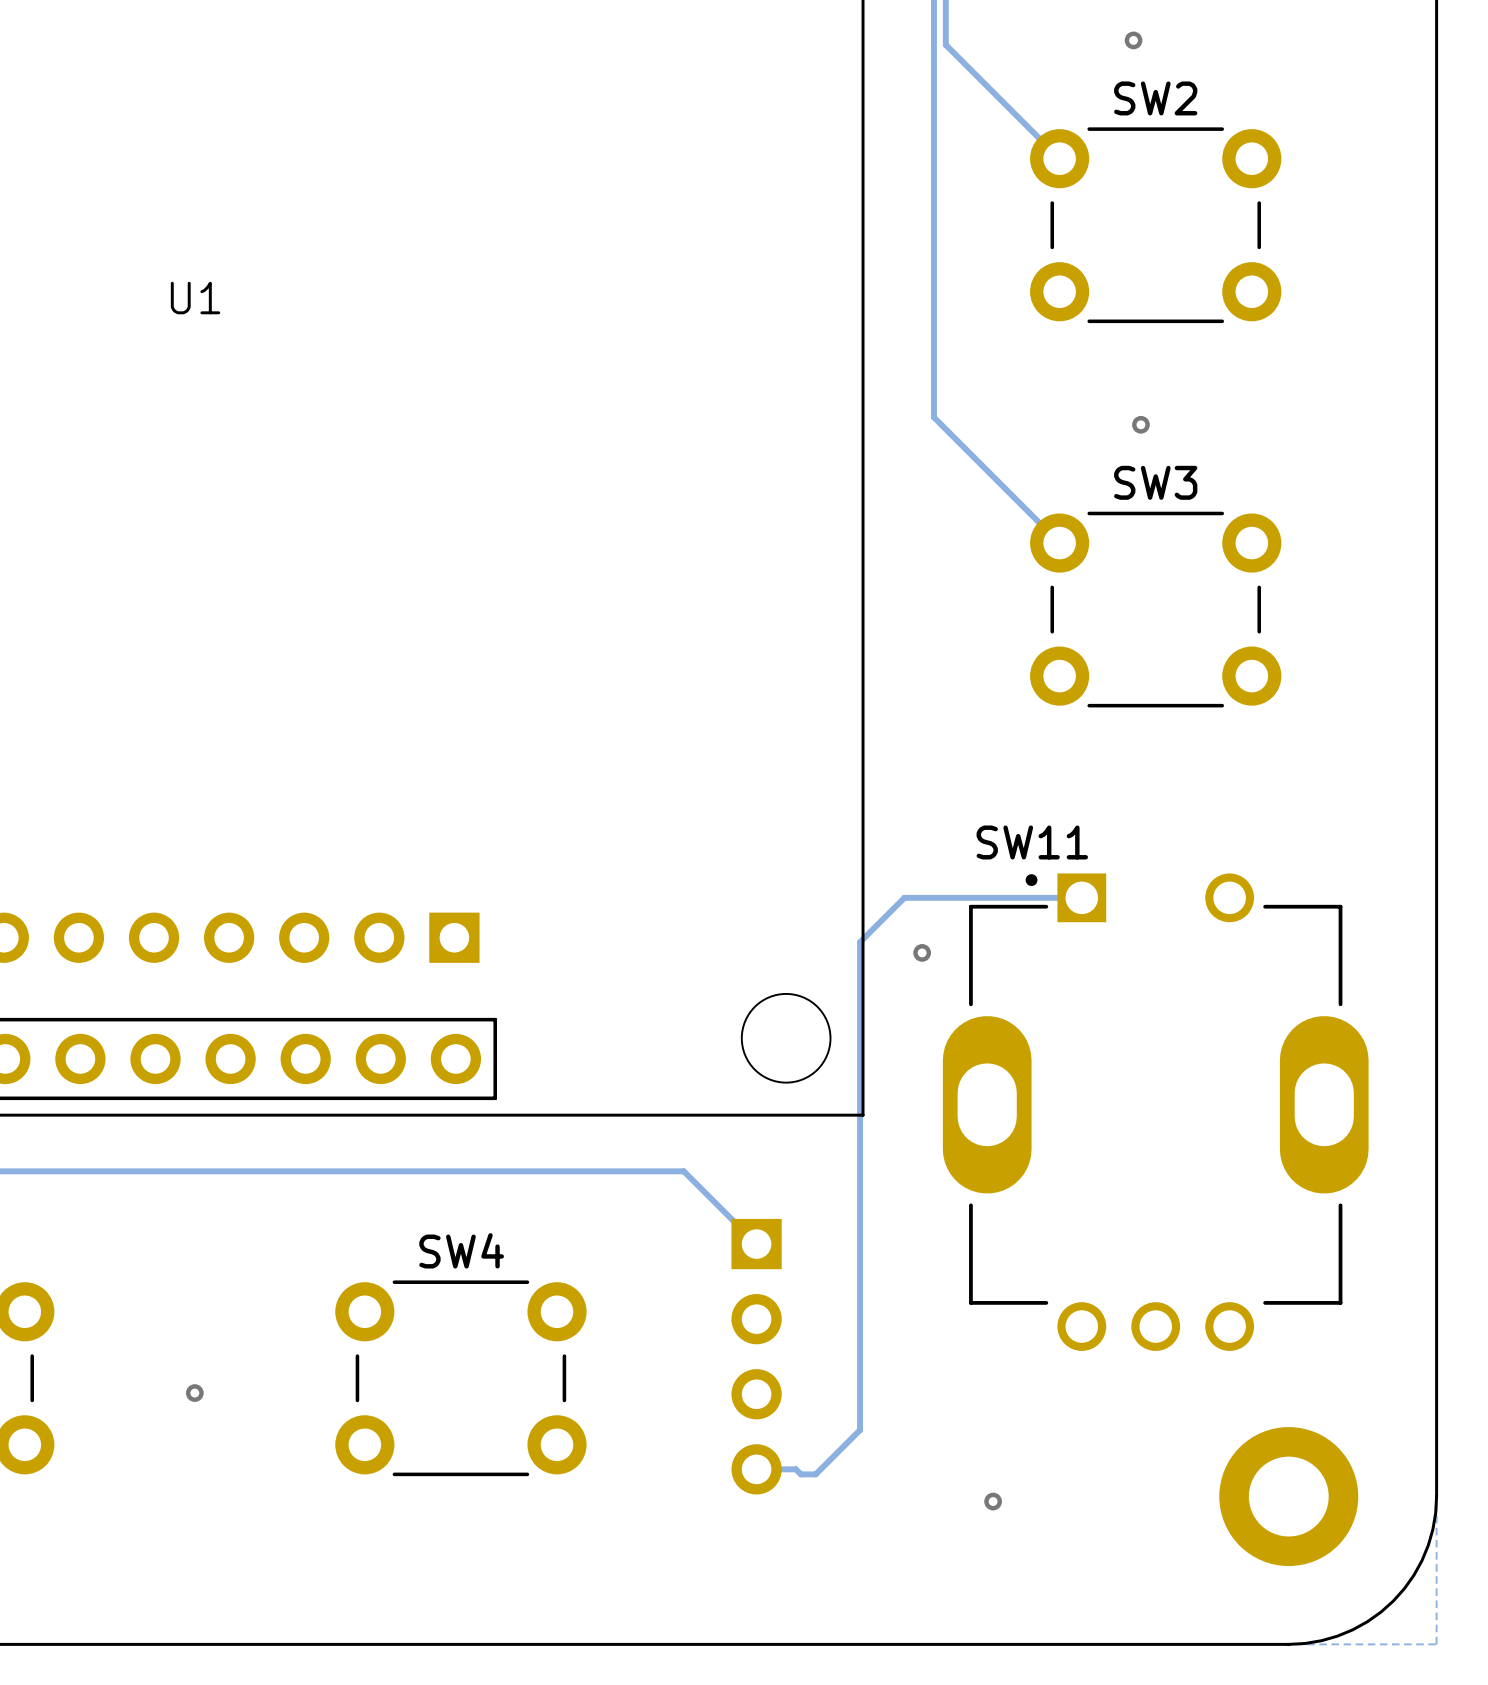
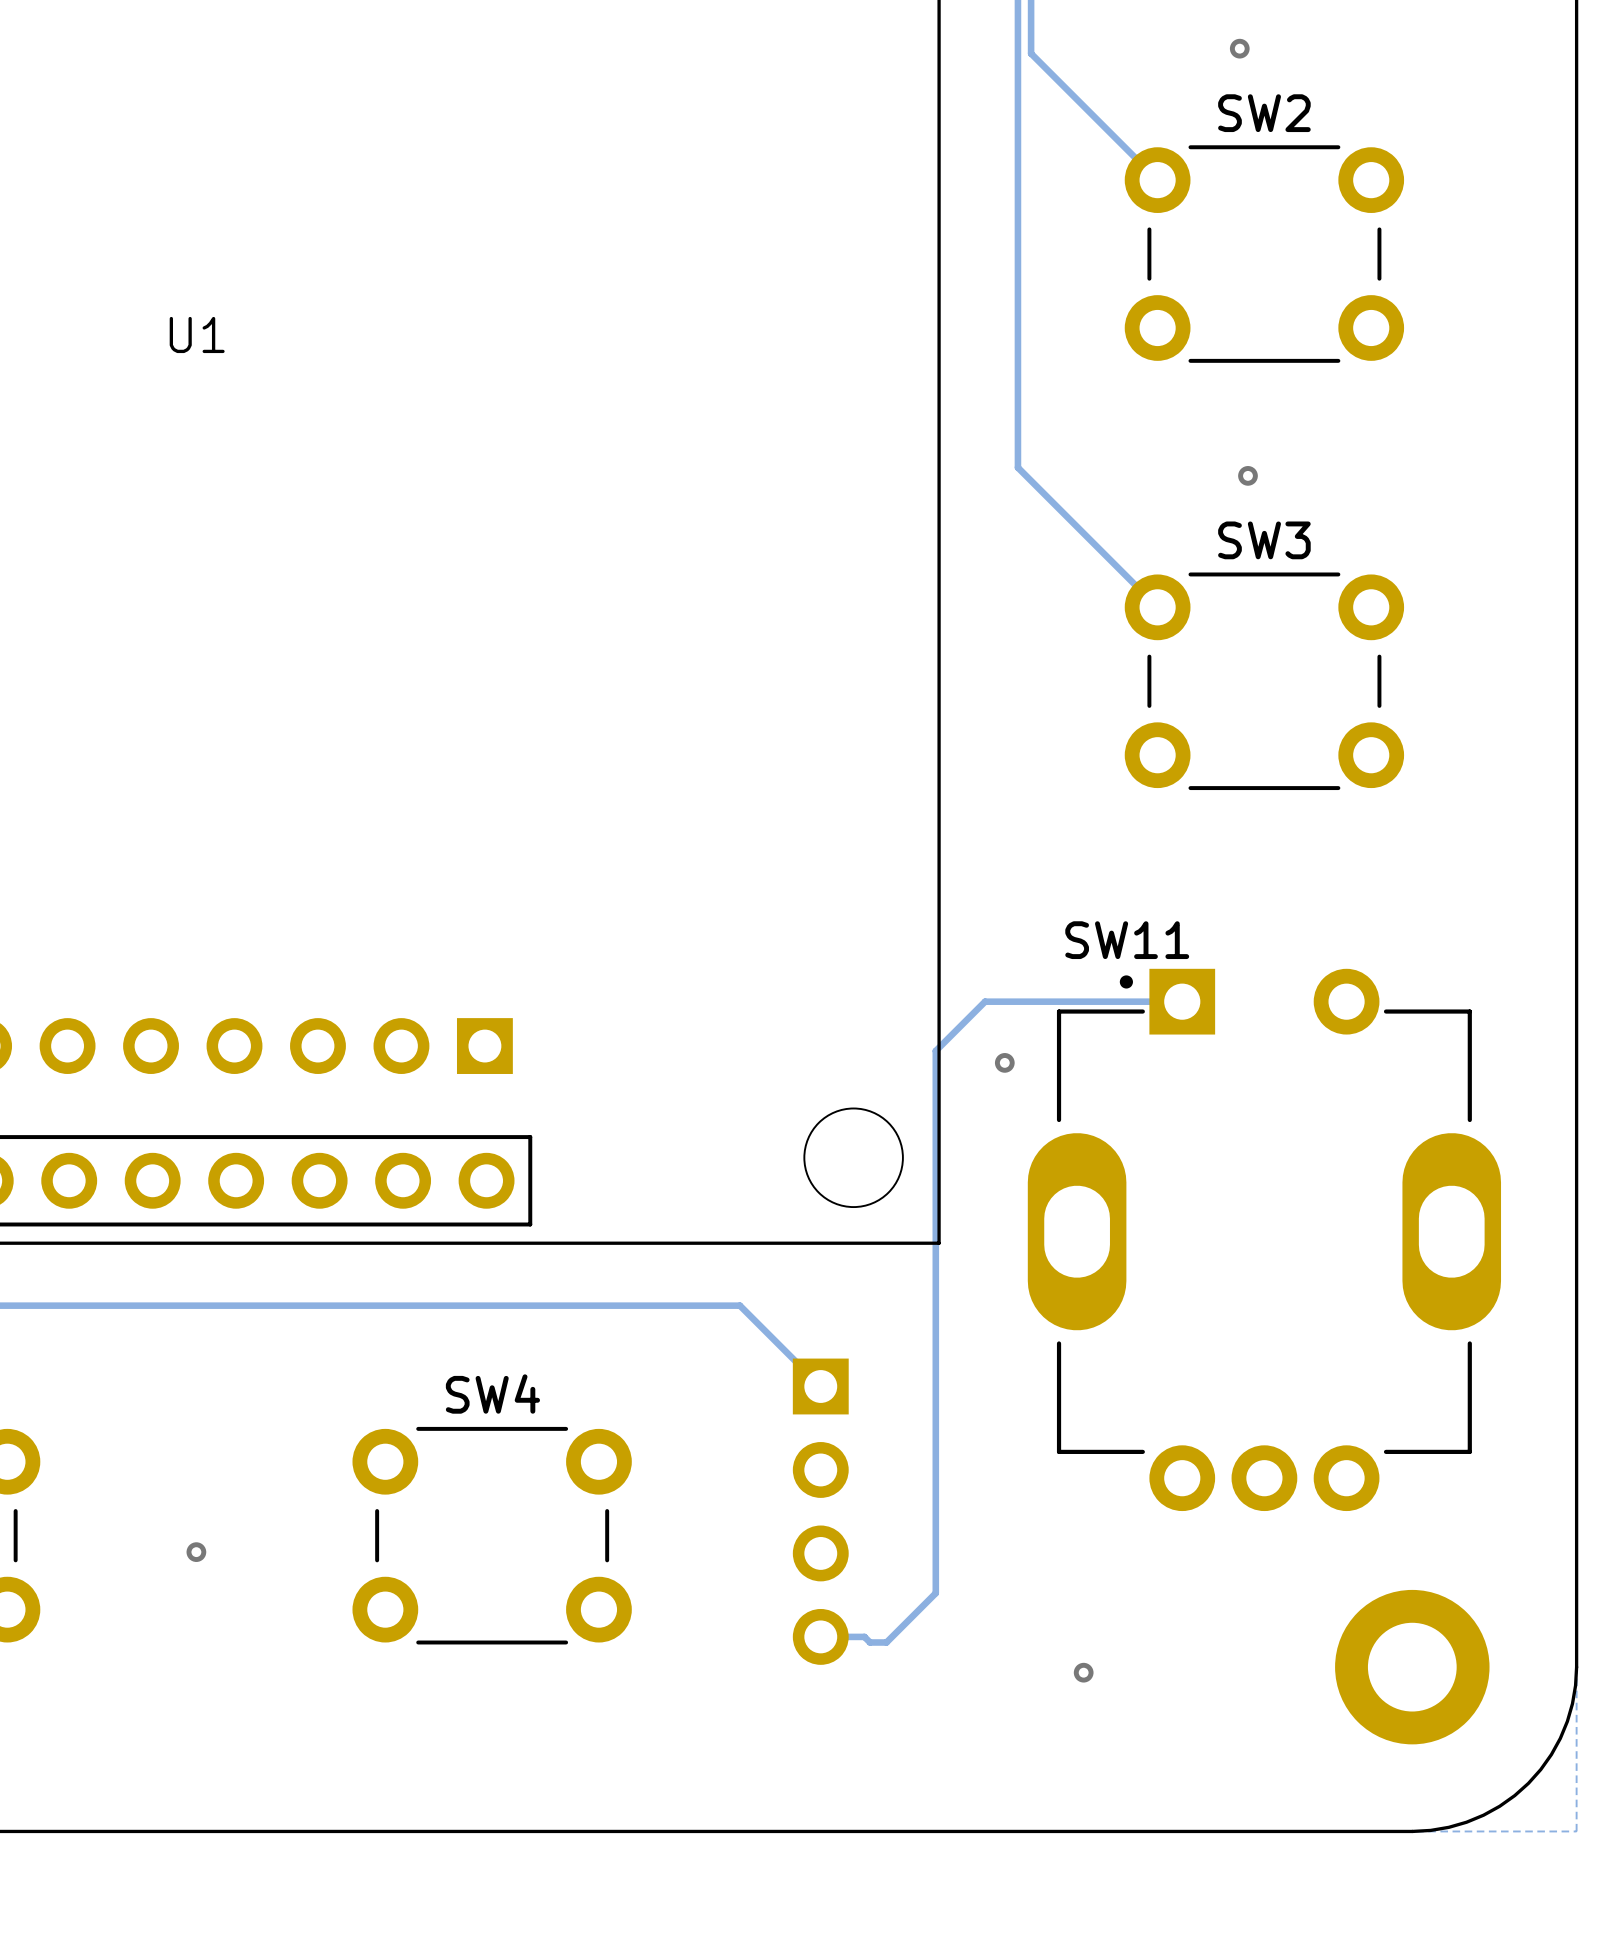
SW11 footprint: [942, 873, 1369, 1351] -> [1027, 968, 1502, 1512]

